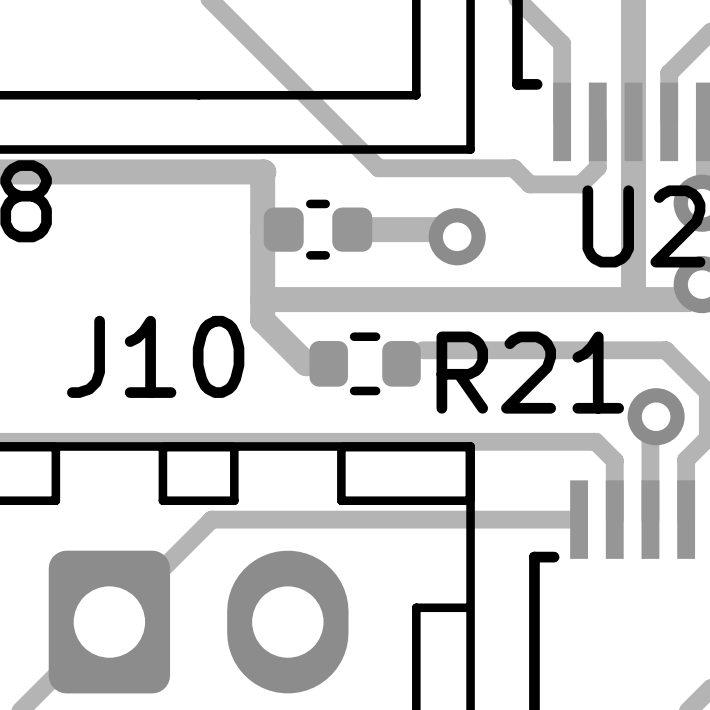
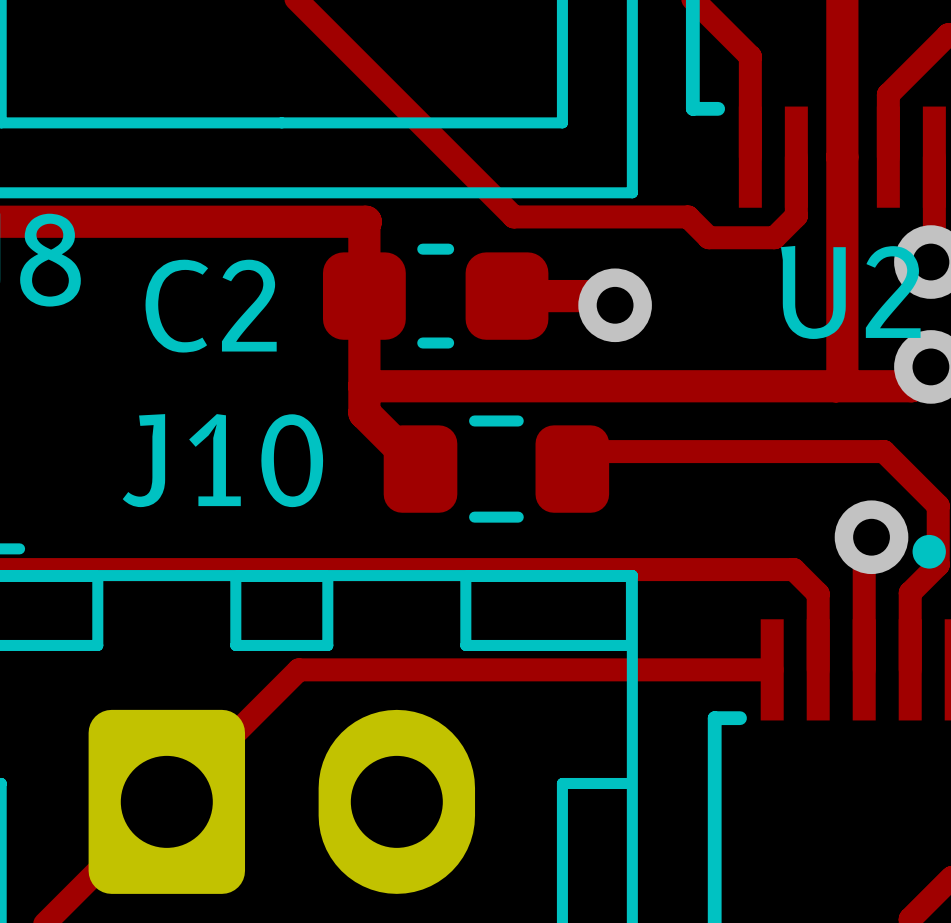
part: (317, 229) -> none
C2: none -> (435, 296)
R21: (365, 363) -> none
part: none -> (496, 469)

